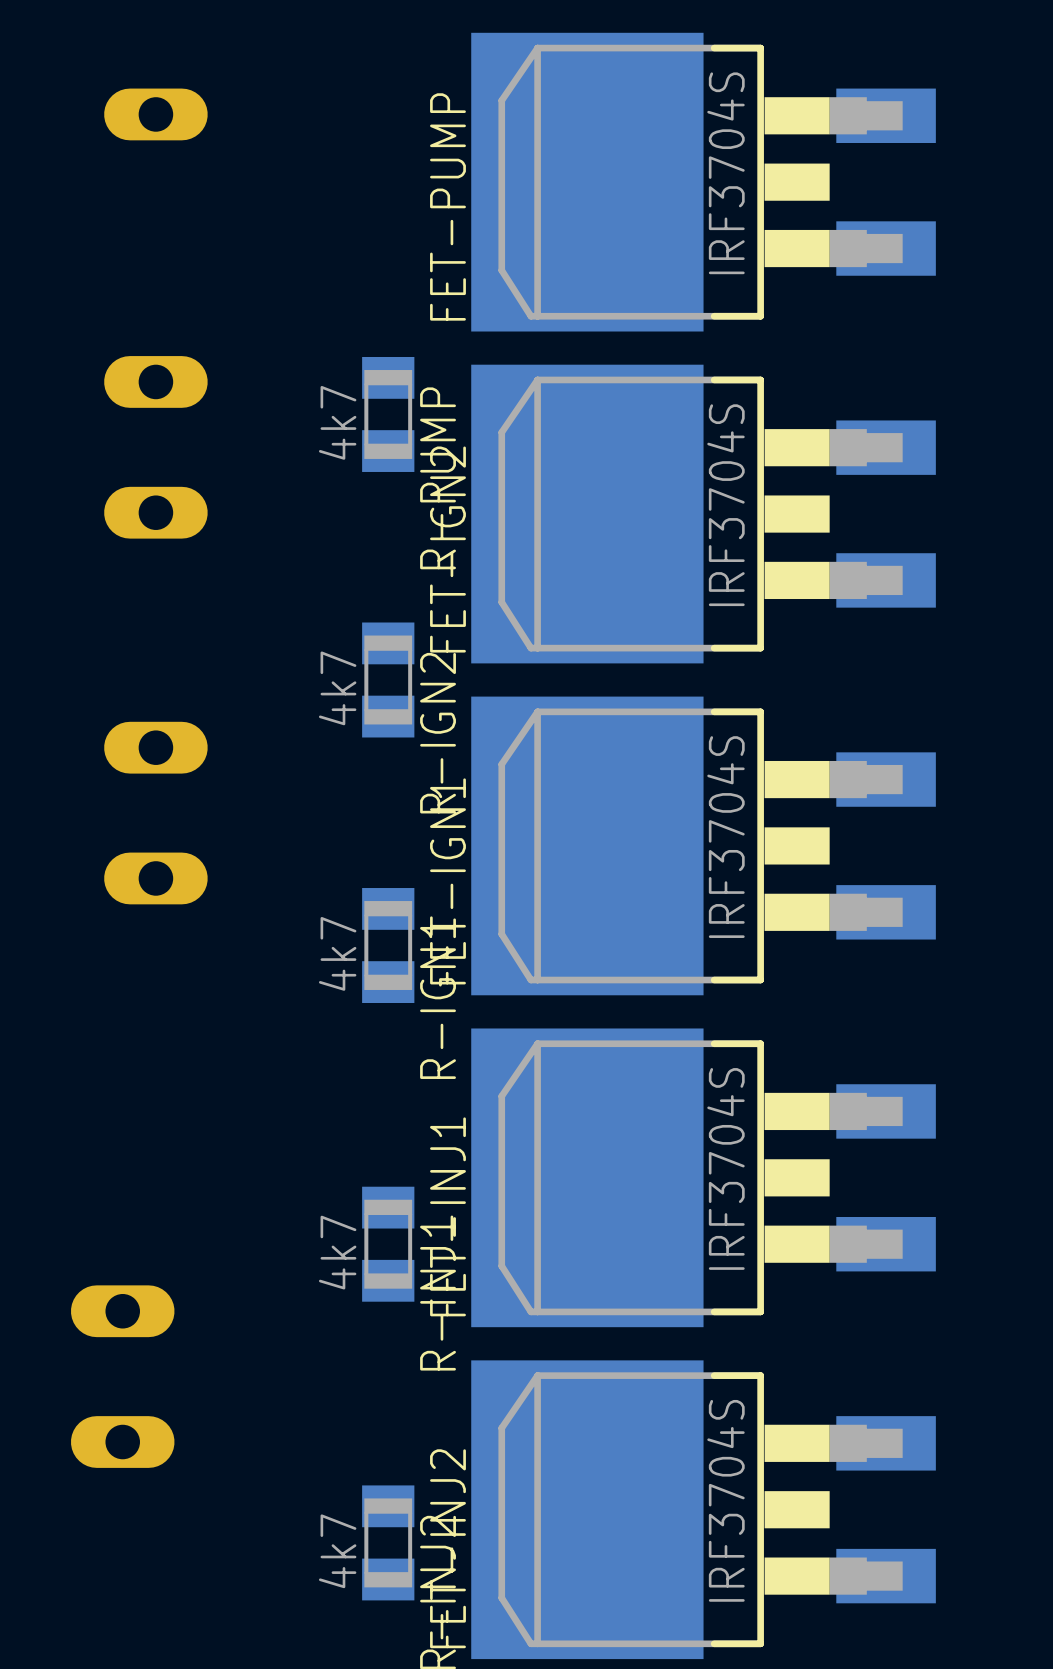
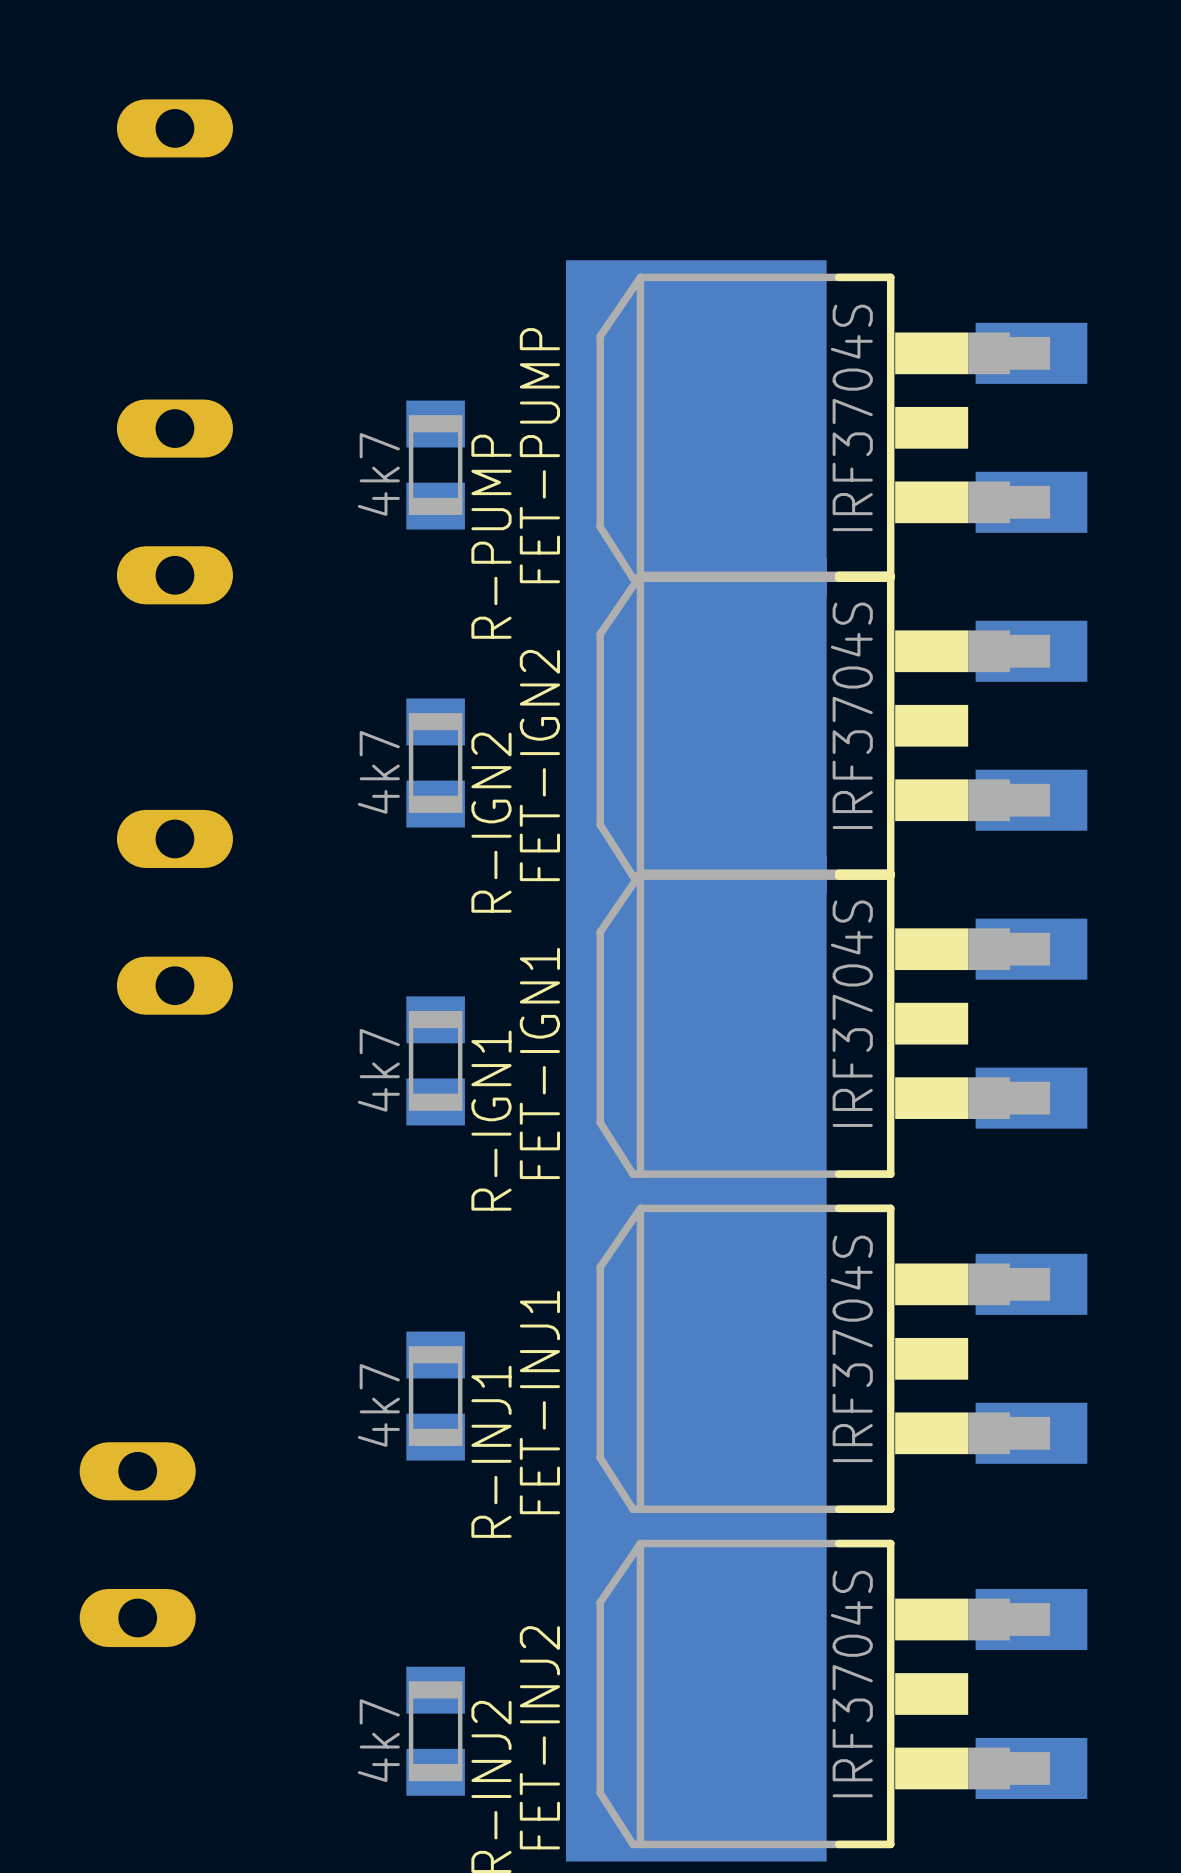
FET-PUMP position: (703, 182) -> (826, 427)
FET-IGN2 position: (703, 514) -> (826, 725)
FET-IGN1 position: (703, 845) -> (826, 1023)
FET-INJ1 position: (703, 1177) -> (826, 1358)
FET-INJ2 position: (703, 1509) -> (826, 1693)

